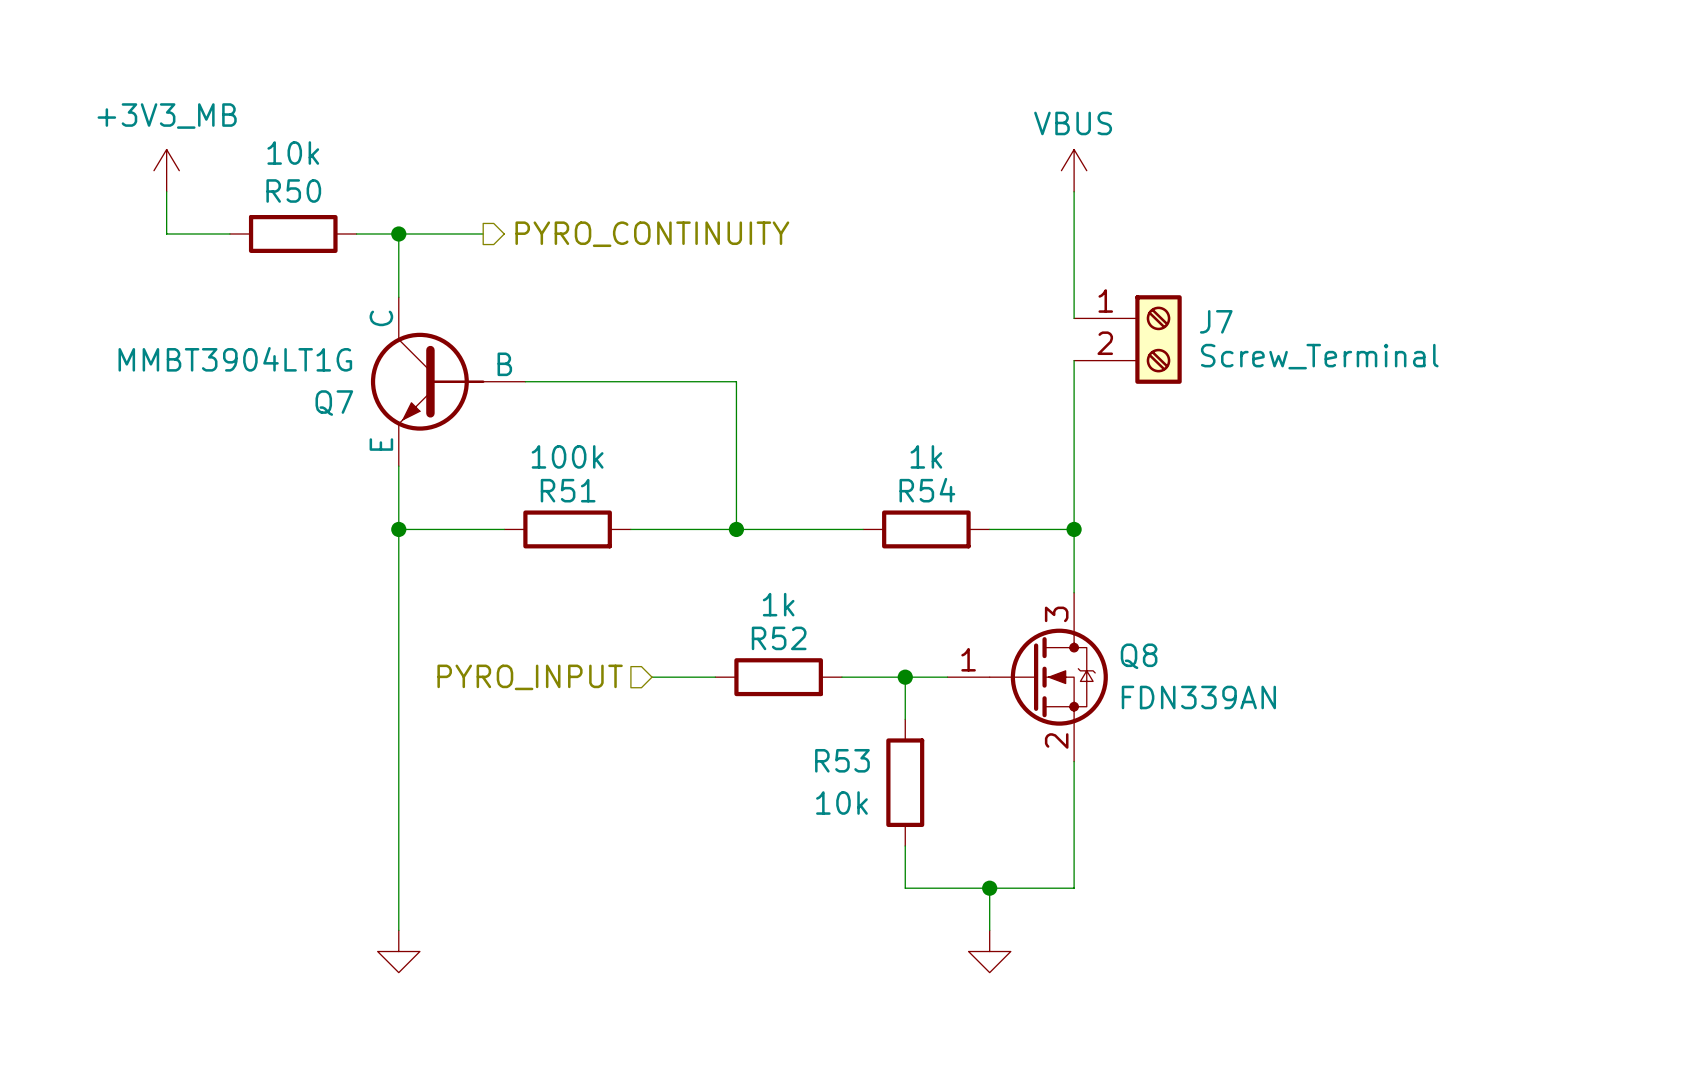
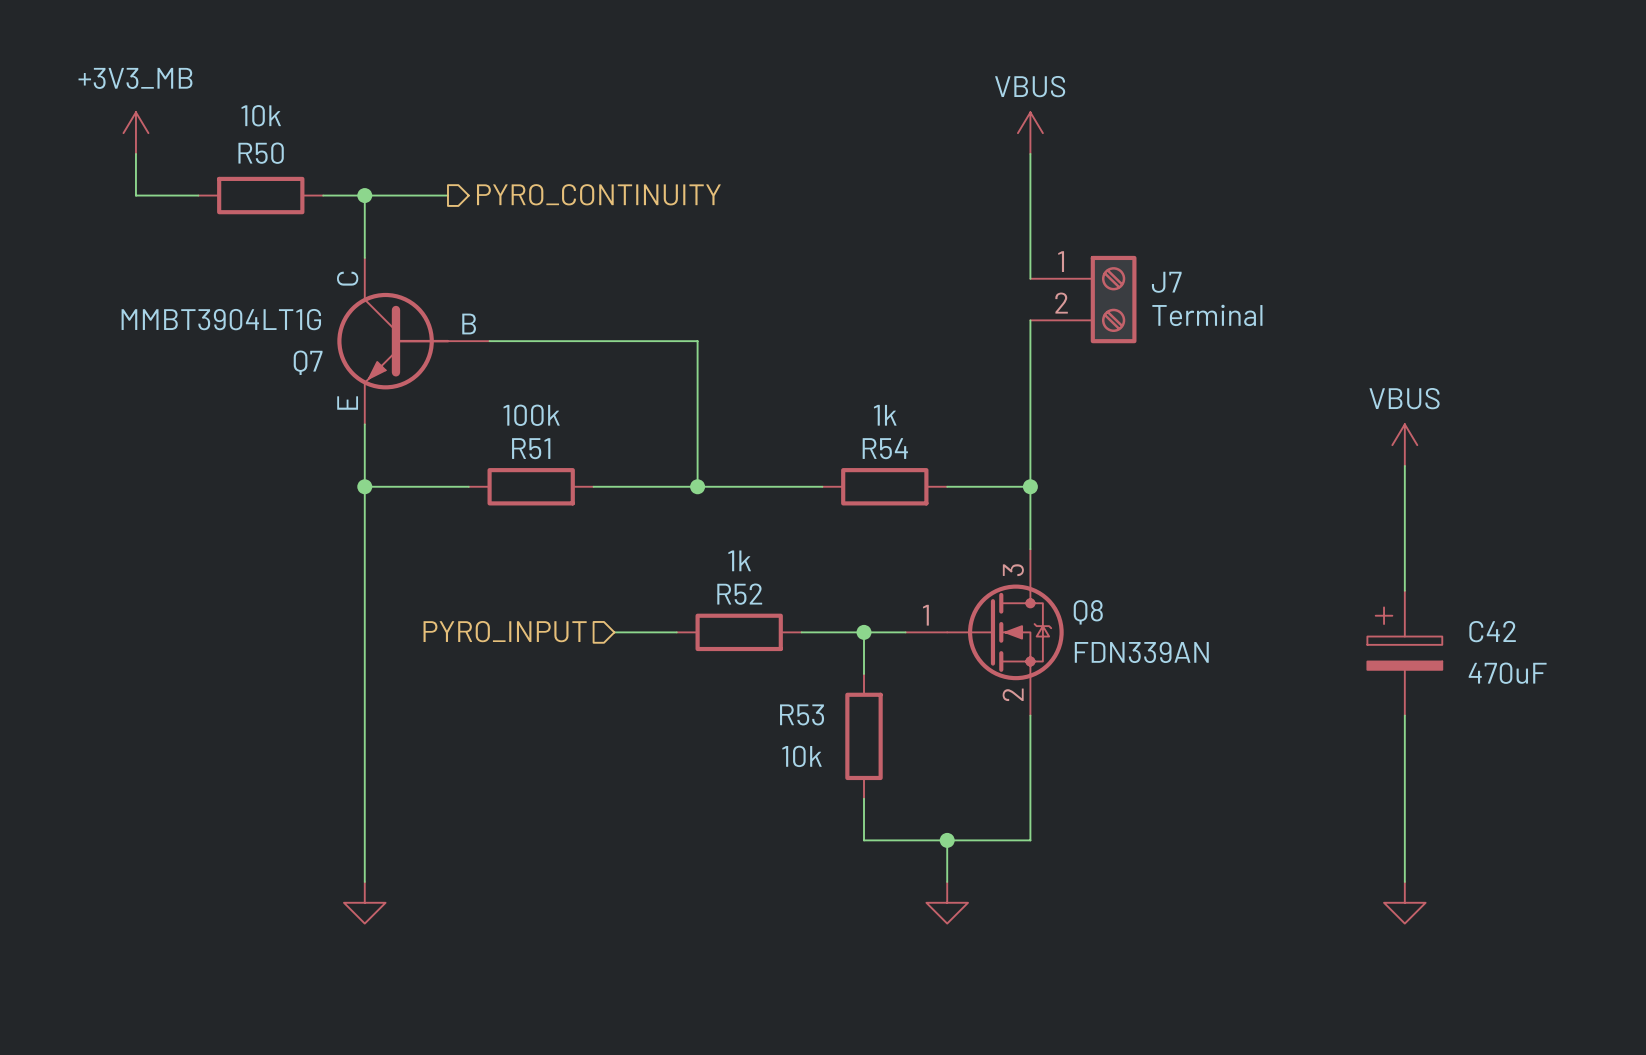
J7 value: Screw_Terminal (1319, 356) -> Terminal (1207, 315)
power symbol: none -> VBUS (1404, 445)
wire: none -> (1404, 465) (1404, 590)
C42: none -> 470uF (1404, 653)
wire: none -> (1404, 715) (1404, 881)
power symbol: none -> (1404, 902)

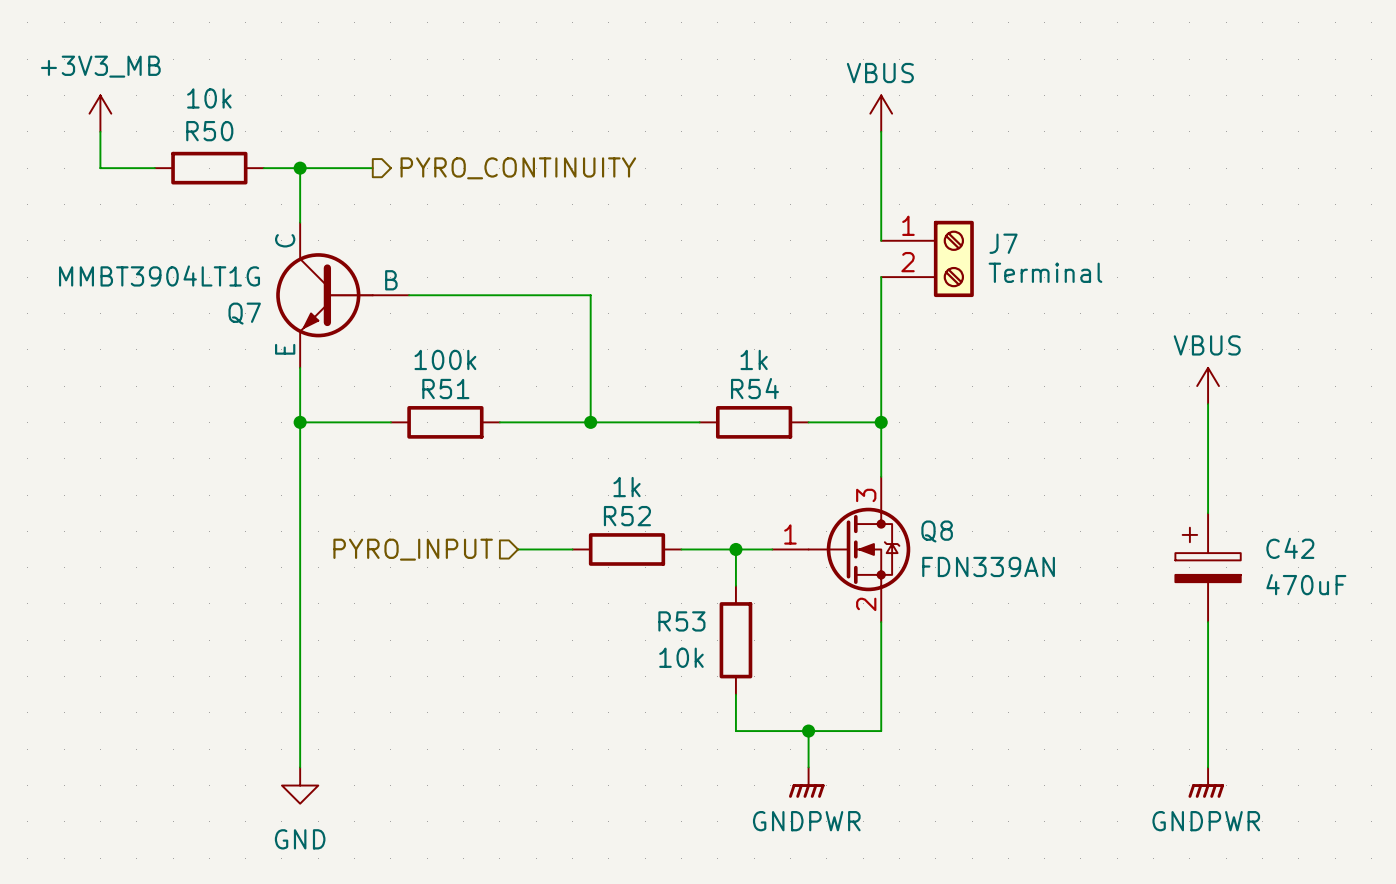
power symbol shape: [926, 881, 969, 924] -> [788, 767, 825, 798]
power symbol shape: [1384, 881, 1426, 924] -> [1188, 767, 1225, 798]
power symbol text: none -> GNDPWR (806, 821)
power symbol text: none -> GNDPWR (1206, 821)
power symbol text: none -> GND (300, 839)

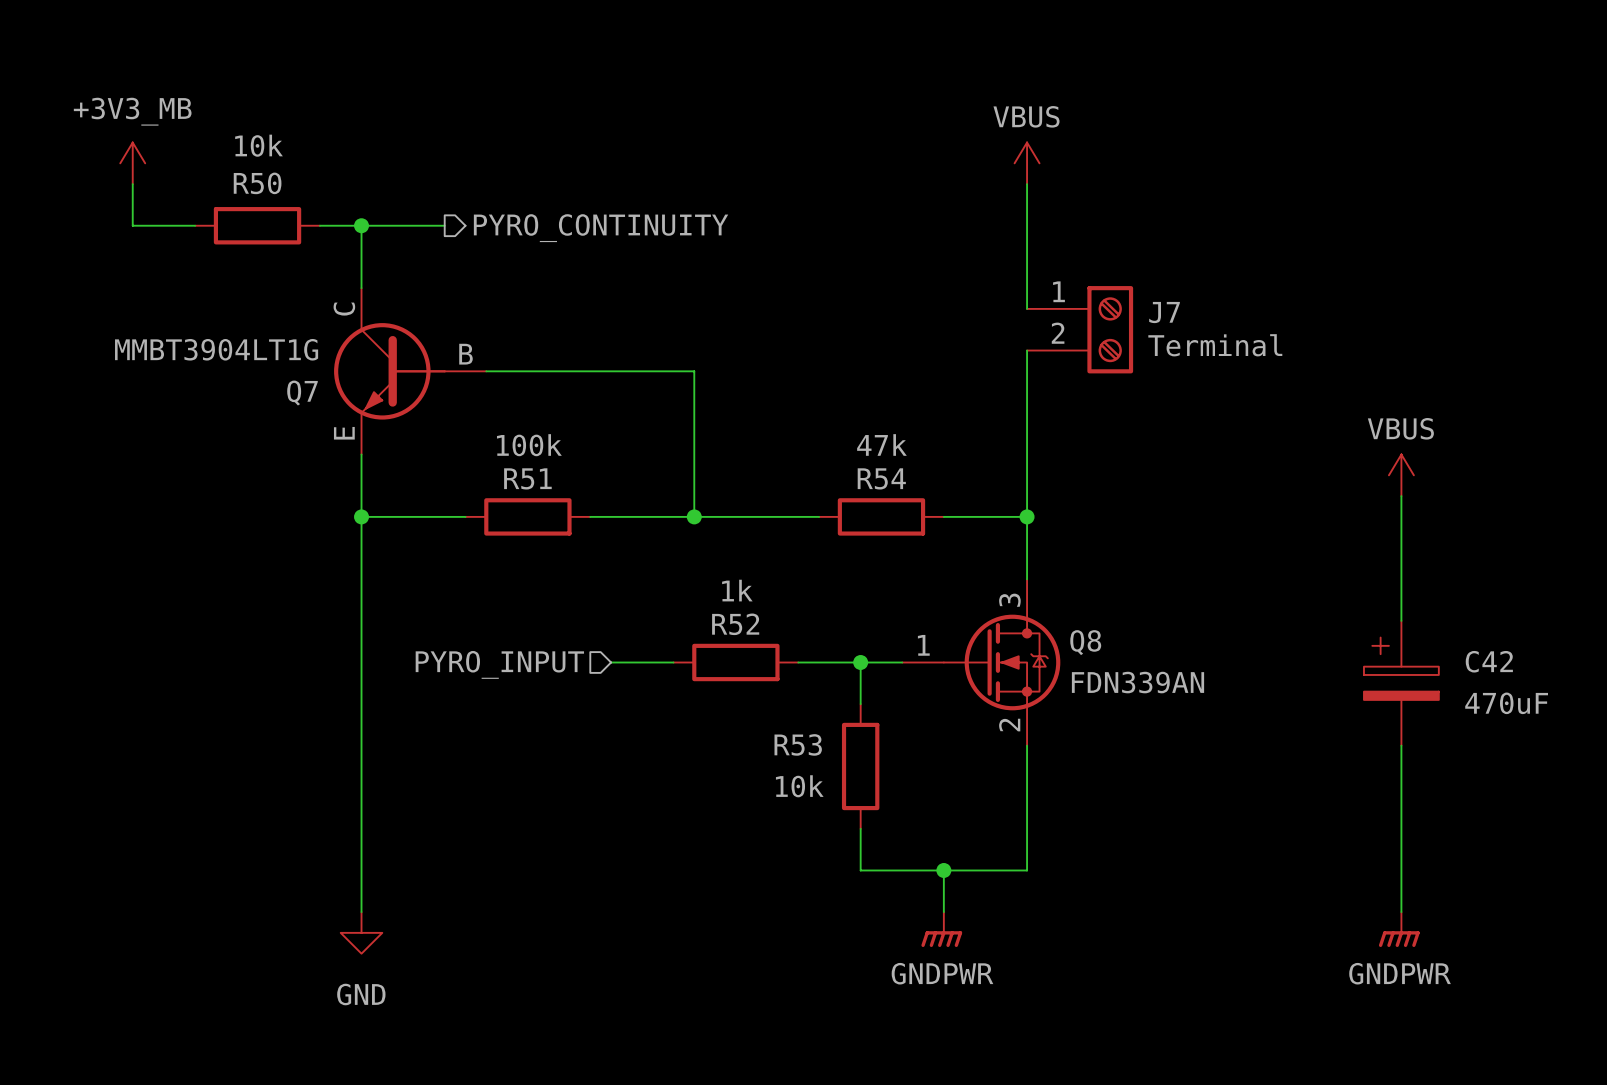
R54 value: 1k (754, 359) -> 47k (881, 444)

